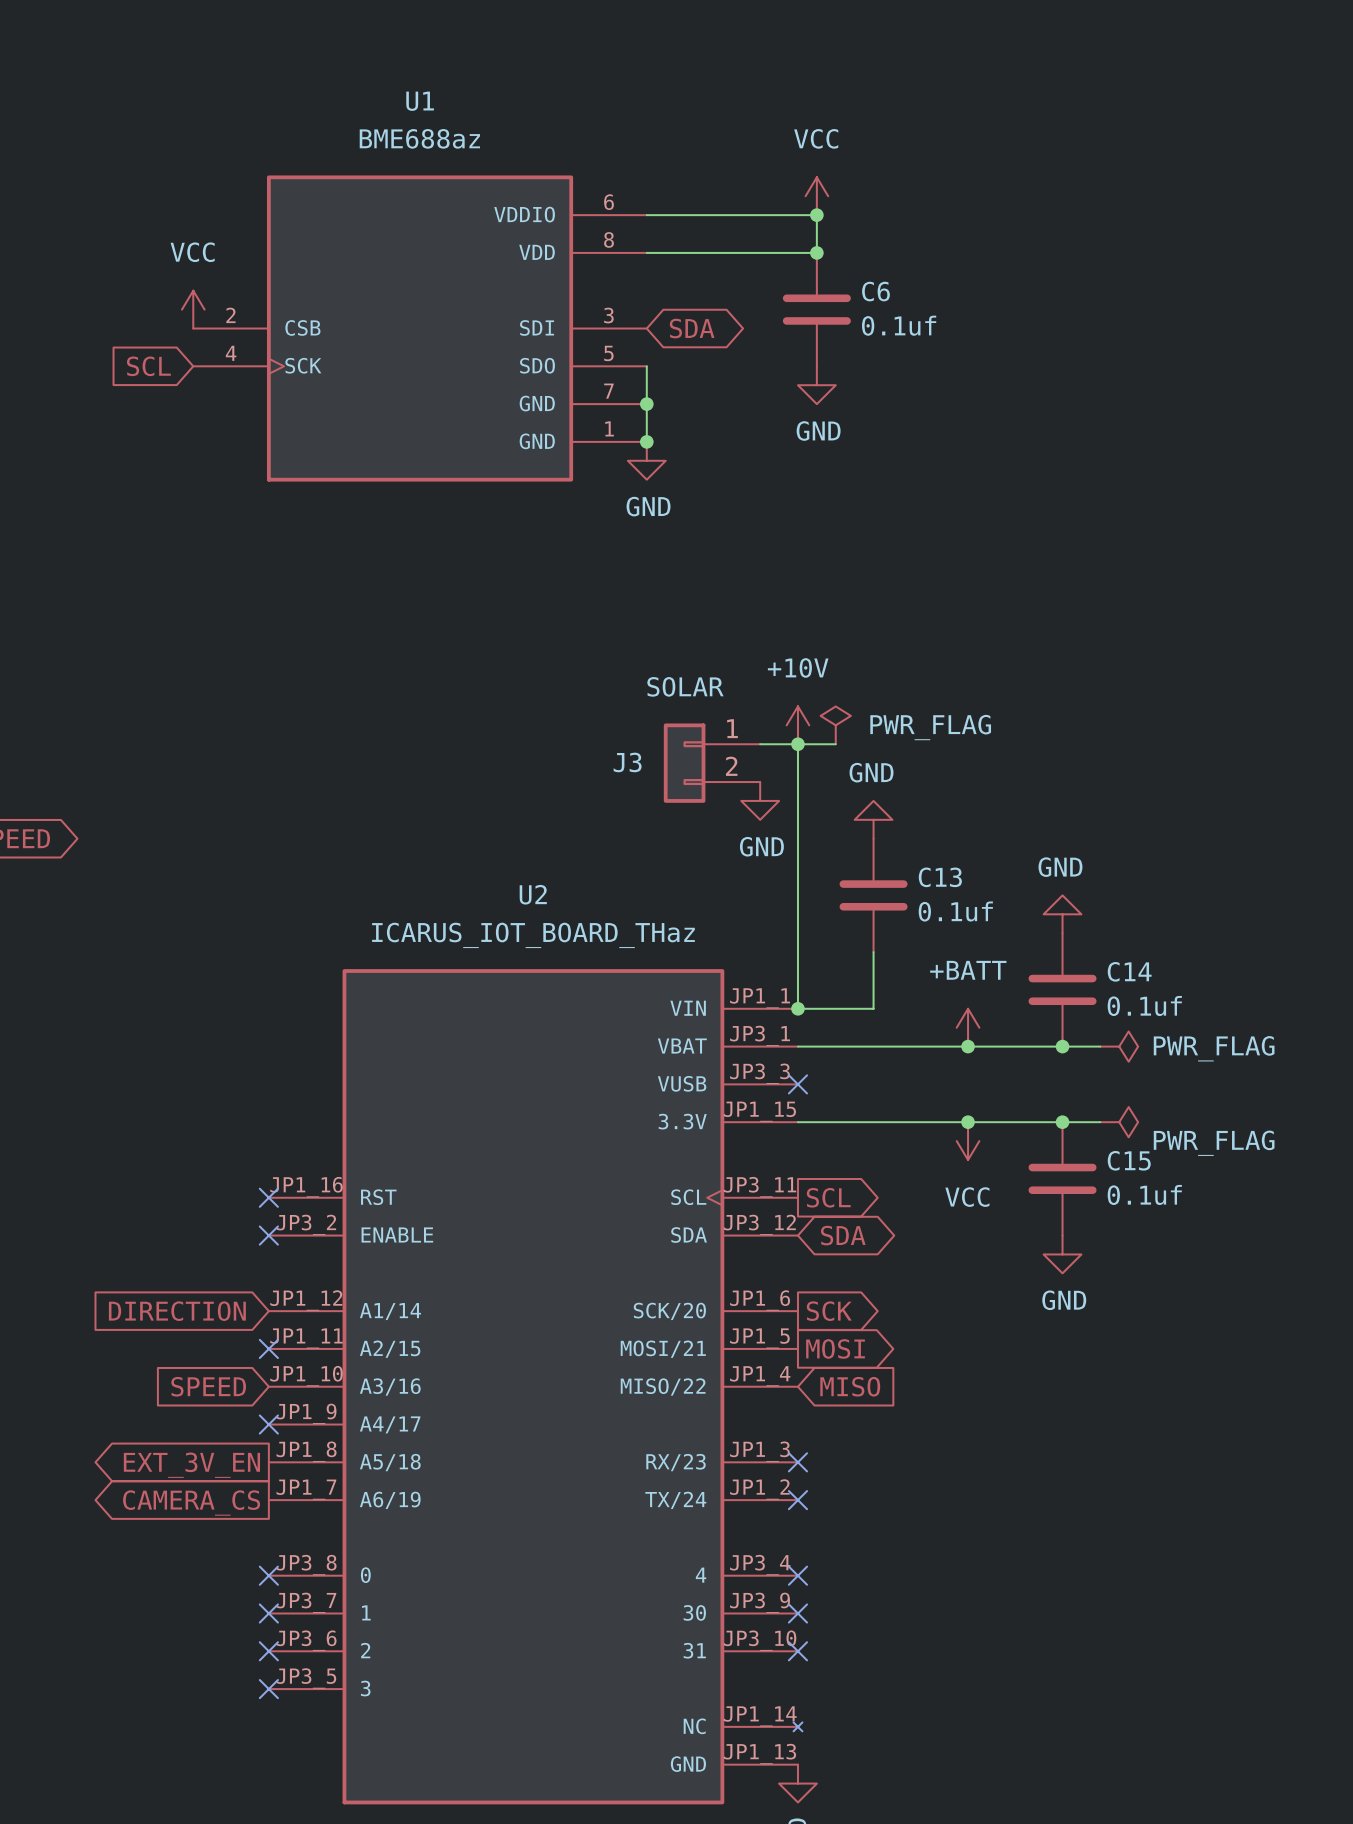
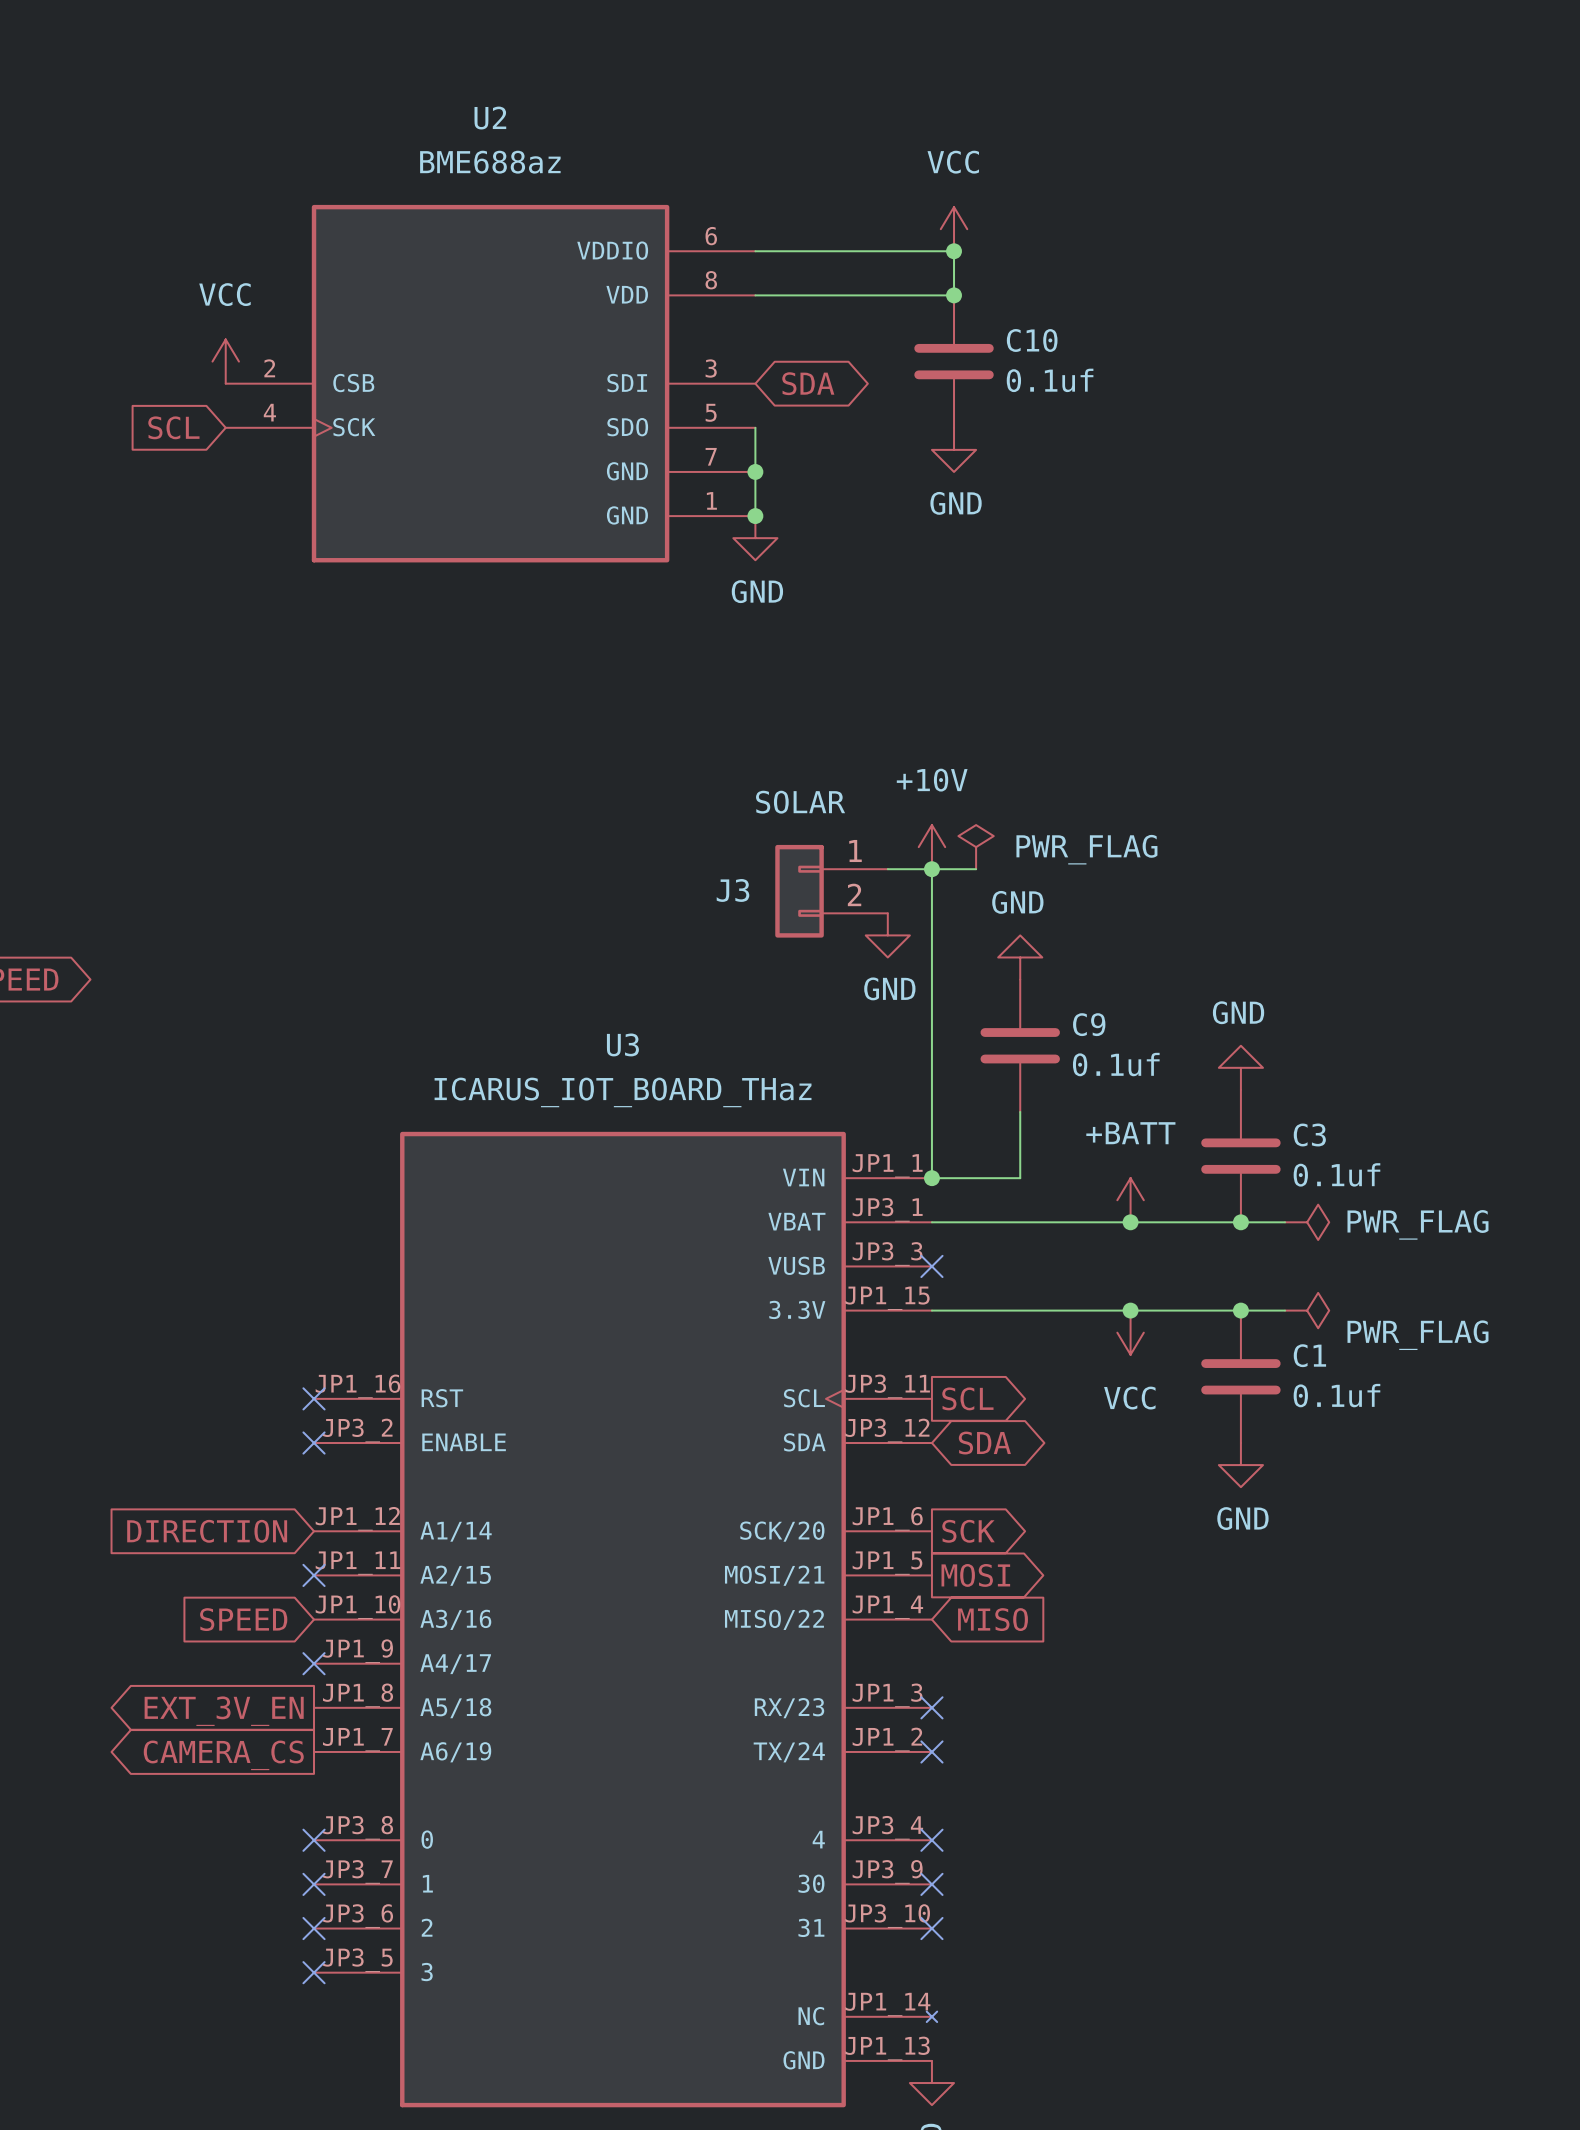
U1 name: U1 (420, 101) -> U2 (490, 118)
C6 name: C6 (875, 291) -> C10 (1032, 340)
C13 name: C13 (940, 877) -> C9 (1089, 1024)
U2 name: U2 (533, 894) -> U3 (622, 1044)
C14 name: C14 (1129, 971) -> C3 (1309, 1134)
C15 name: C15 (1129, 1160) -> C1 (1309, 1355)

